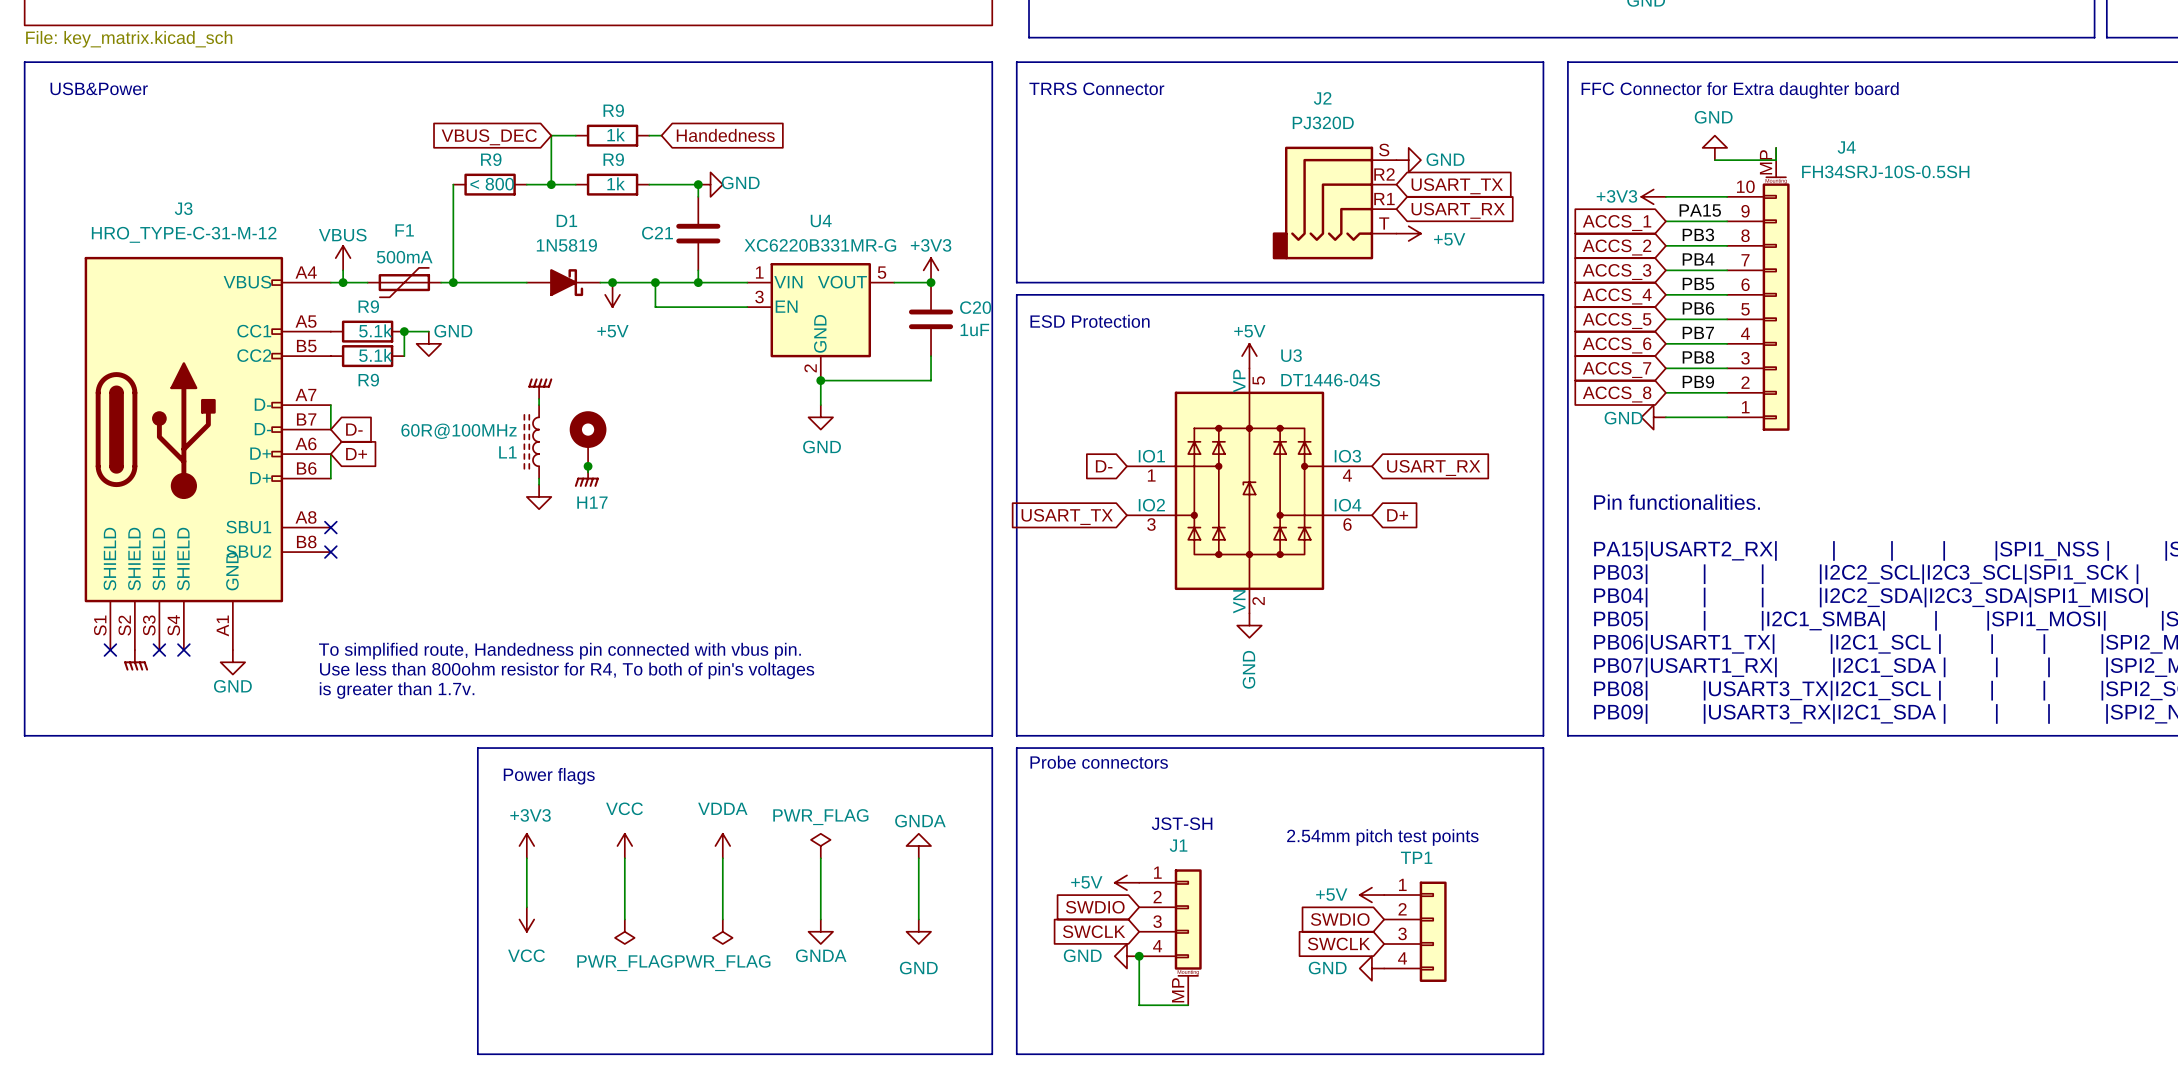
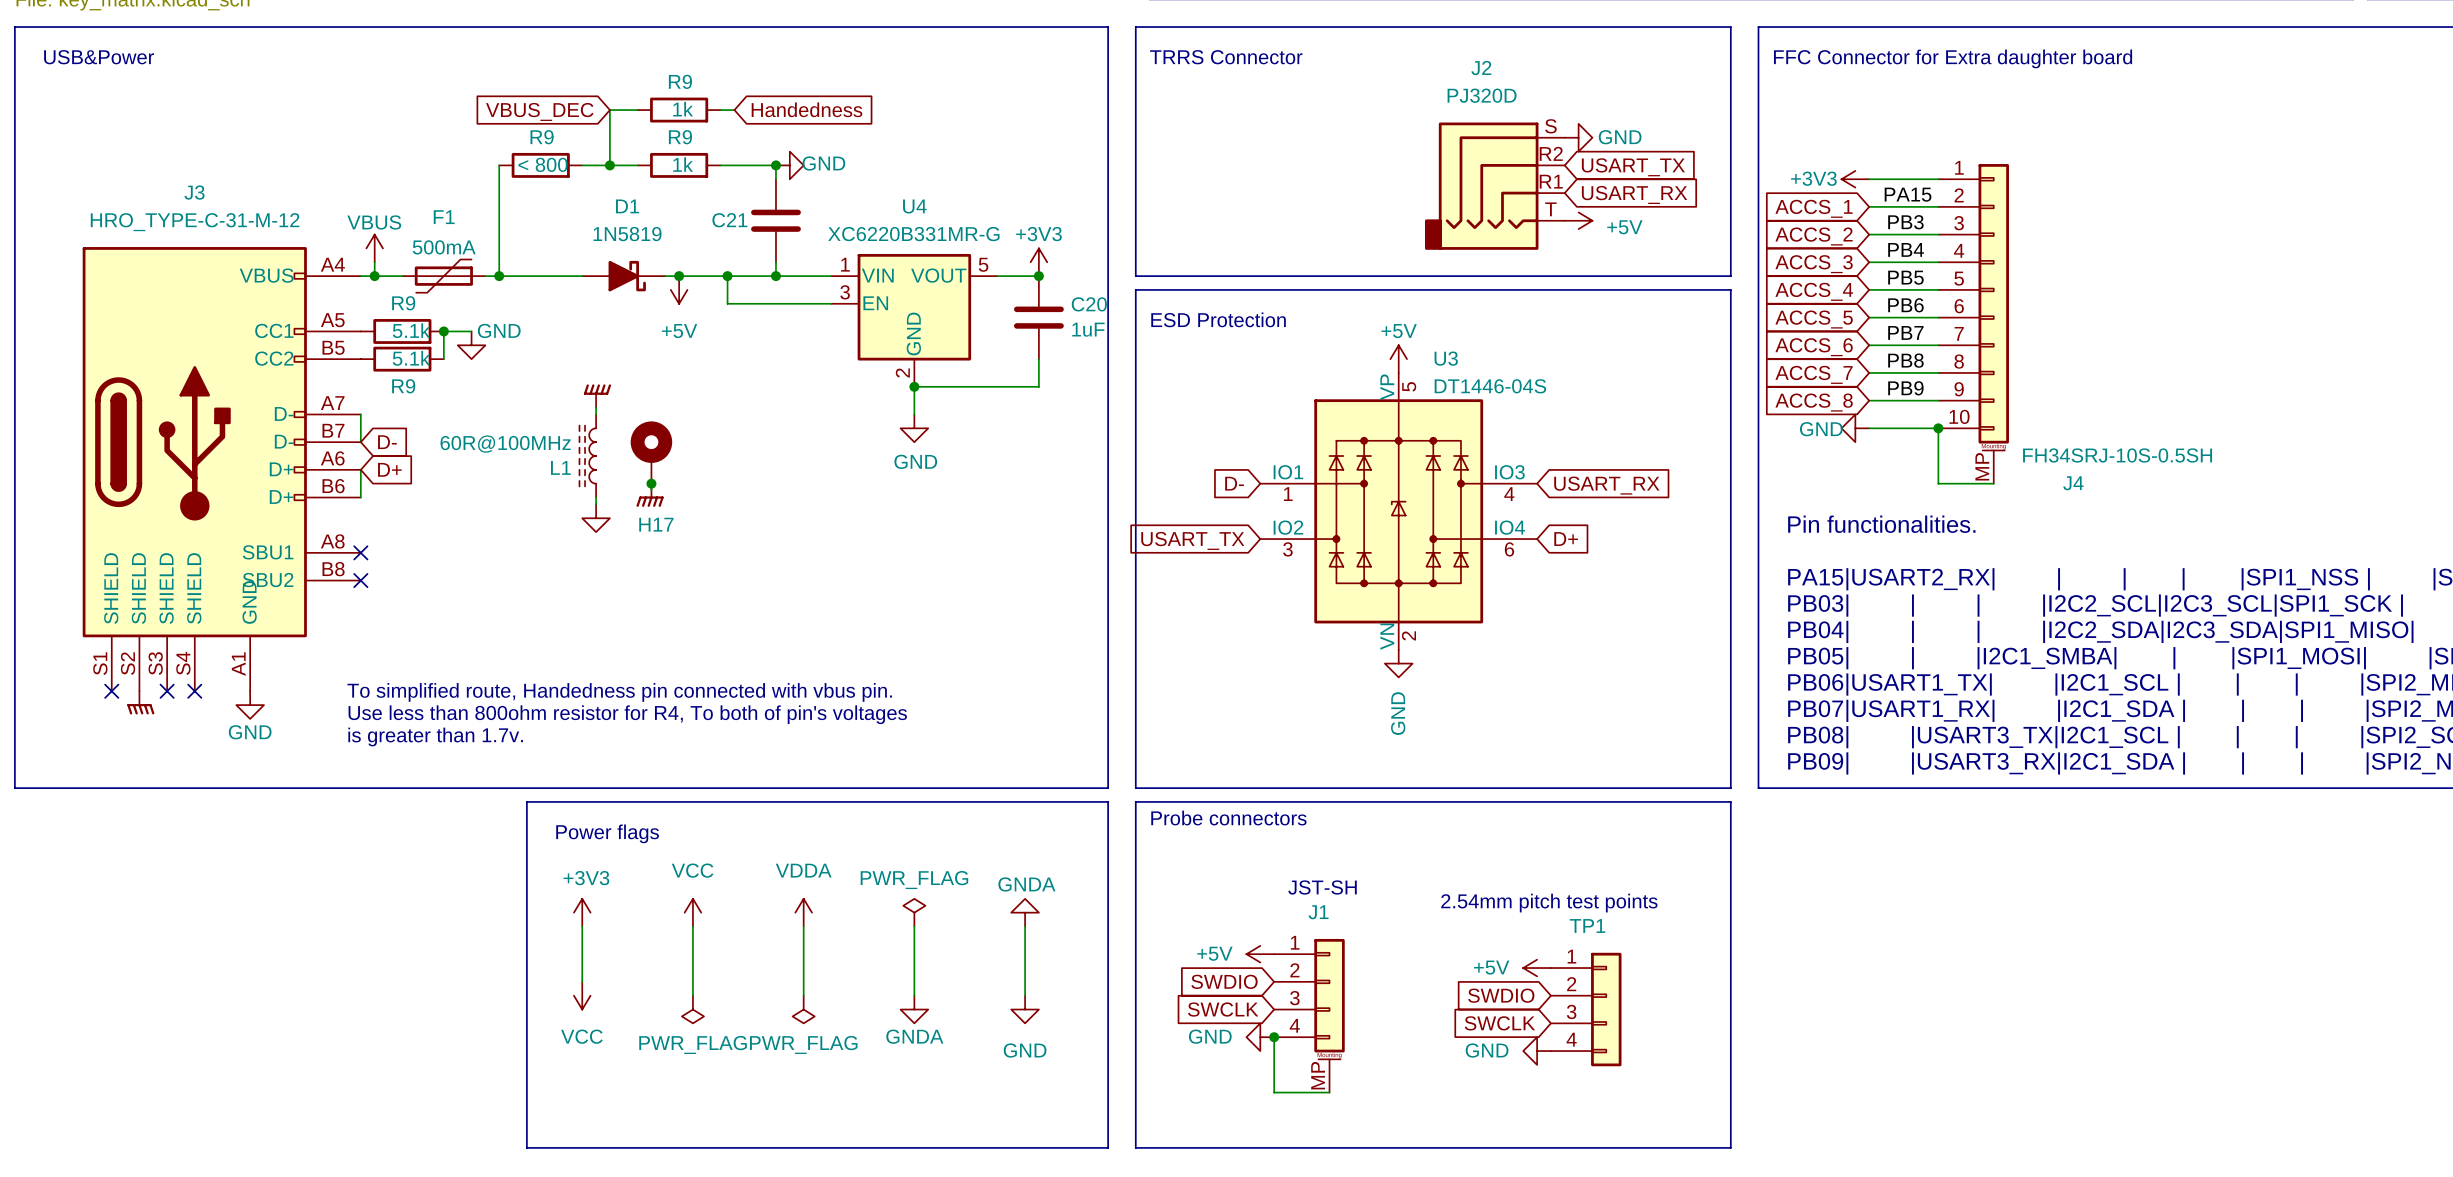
power symbol: GND (1714, 147) -> none
wire: (1776, 147) (1776, 160) (1714, 160) -> none
J4 flip: as is (1776, 303) -> up-down (1993, 307)
wire: none -> (1938, 428) (1938, 483) (1993, 483)
junction: none -> (1938, 428)

